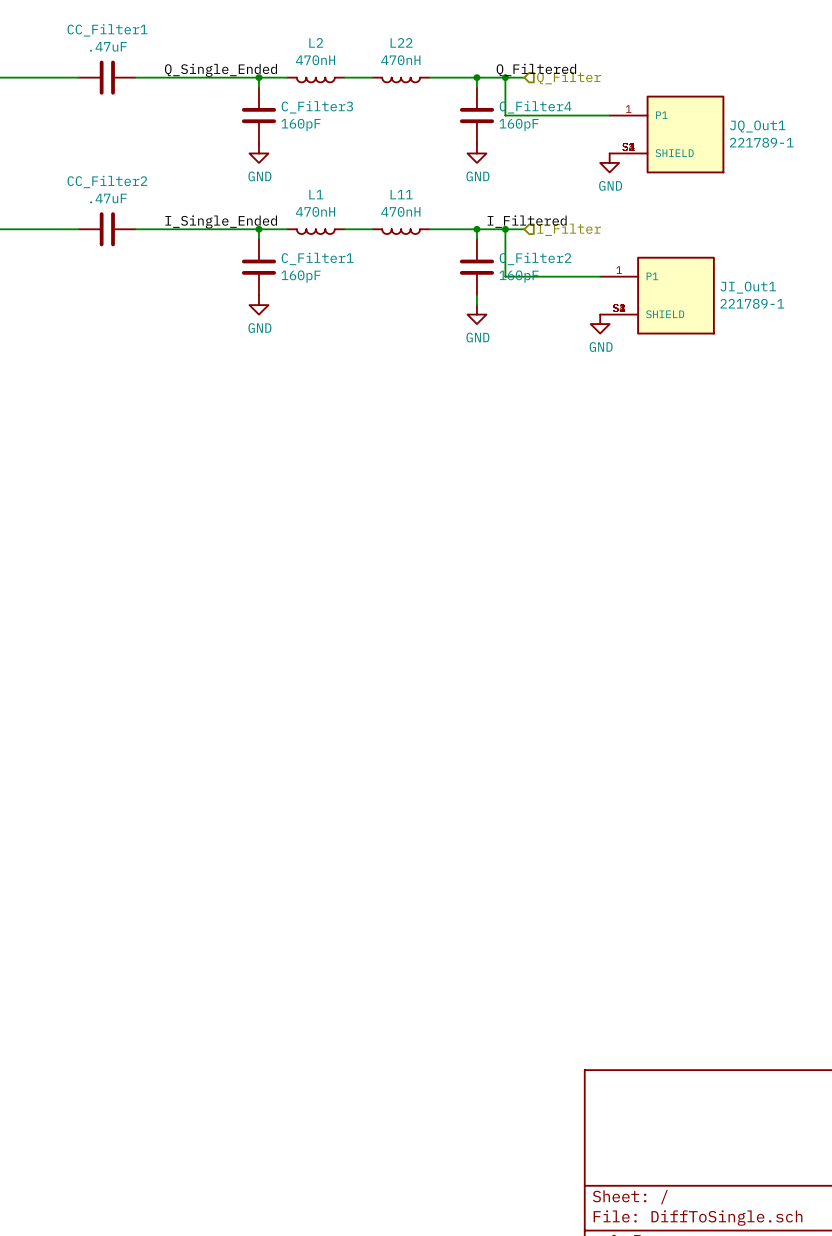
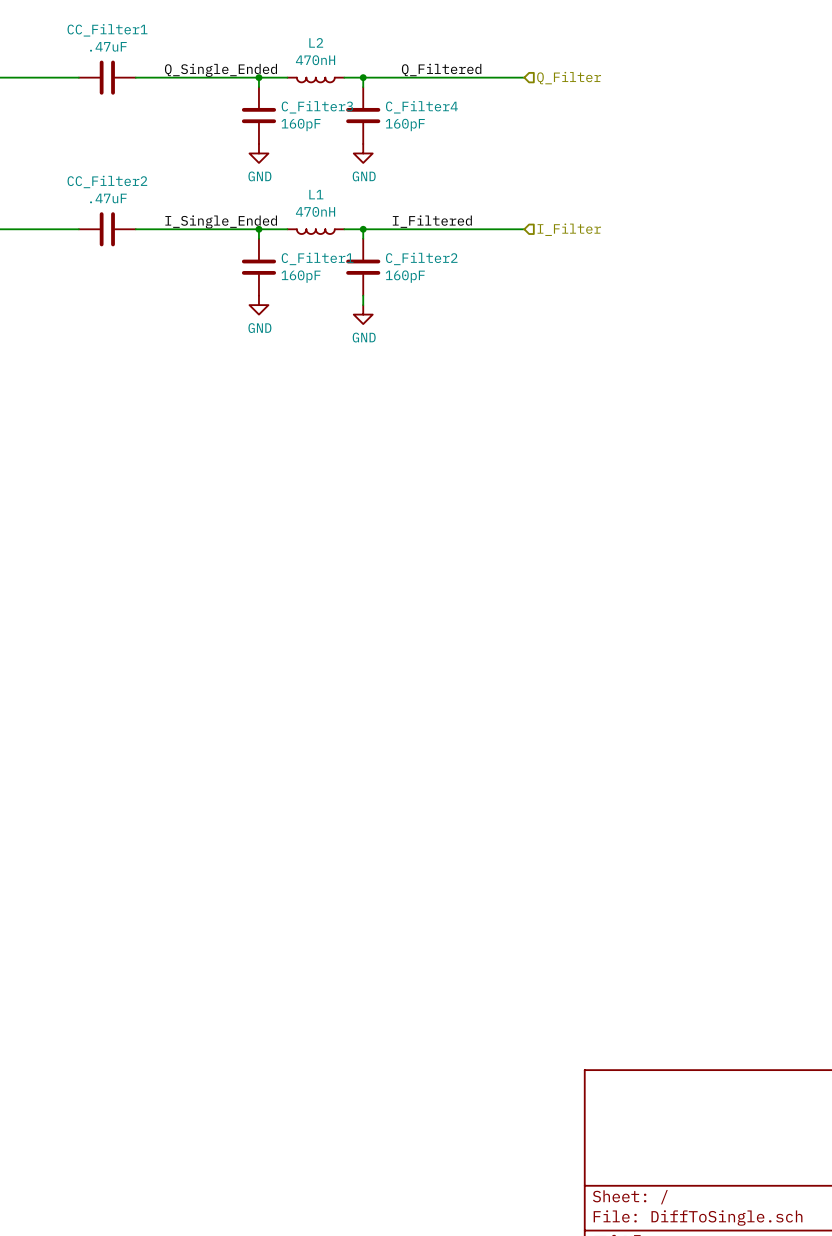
label position: Q_Filtered (536, 69) -> Q_Filtered (441, 69)
junction: none -> (363, 77)
wire: none -> (372, 77) (429, 77)
wire: (476, 77) (476, 87) -> (363, 77) (363, 87)
junction: (476, 77) -> none
wire: (505, 77) (505, 115) (609, 115) -> none
junction: (505, 77) -> none
L22: 470nH (401, 80) -> none
C_Filter4 position: (476, 115) -> (363, 115)
JQ_Out1: 221789-1 (667, 134) -> none
power symbol: none -> GND (363, 153)
power symbol: GND (476, 153) -> none
power symbol: GND (609, 162) -> none
label position: I_Filtered (527, 221) -> I_Filtered (432, 221)
junction: none -> (363, 229)
wire: none -> (372, 229) (429, 229)
wire: (476, 229) (476, 238) -> (363, 229) (363, 238)
junction: (476, 229) -> none
wire: (505, 229) (505, 276) (600, 276) -> none
junction: (505, 229) -> none
L11: 470nH (401, 231) -> none
C_Filter2 position: (476, 267) -> (363, 267)
wire: (476, 295) (476, 305) -> (363, 295) (363, 305)
JI_Out1: 221789-1 (657, 295) -> none
power symbol: none -> GND (363, 314)
power symbol: GND (476, 314) -> none
power symbol: GND (600, 324) -> none

